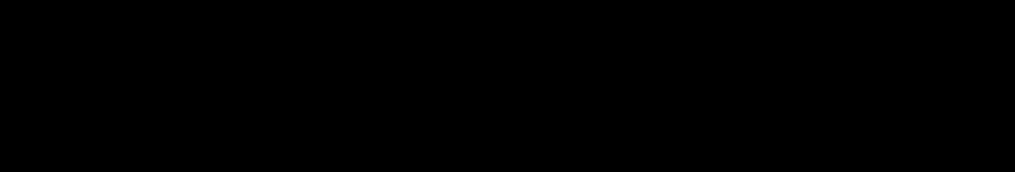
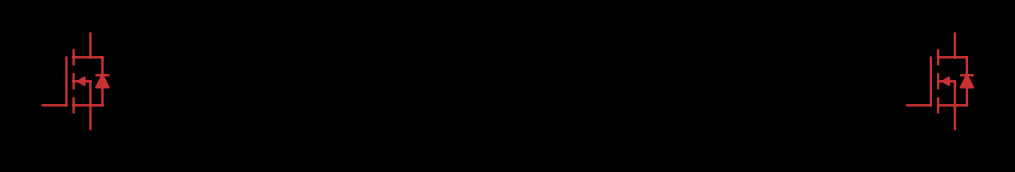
part: none -> (75, 81)
part: none -> (939, 81)

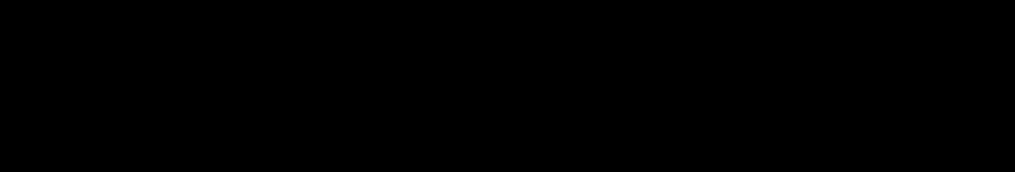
part: (75, 81) -> none
part: (939, 81) -> none

